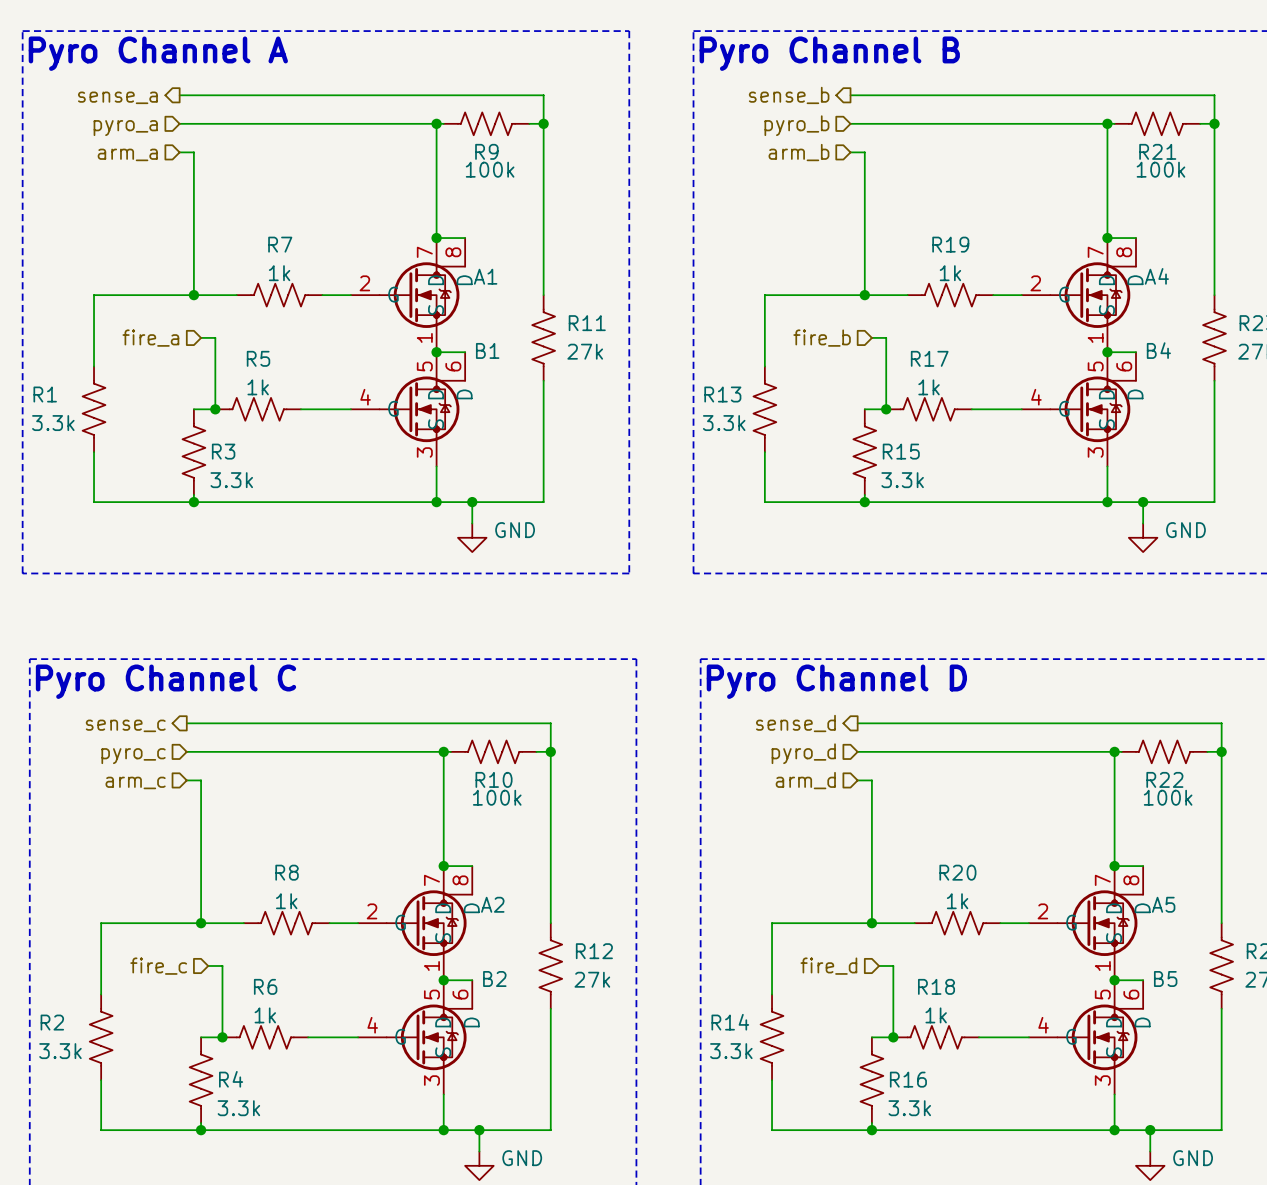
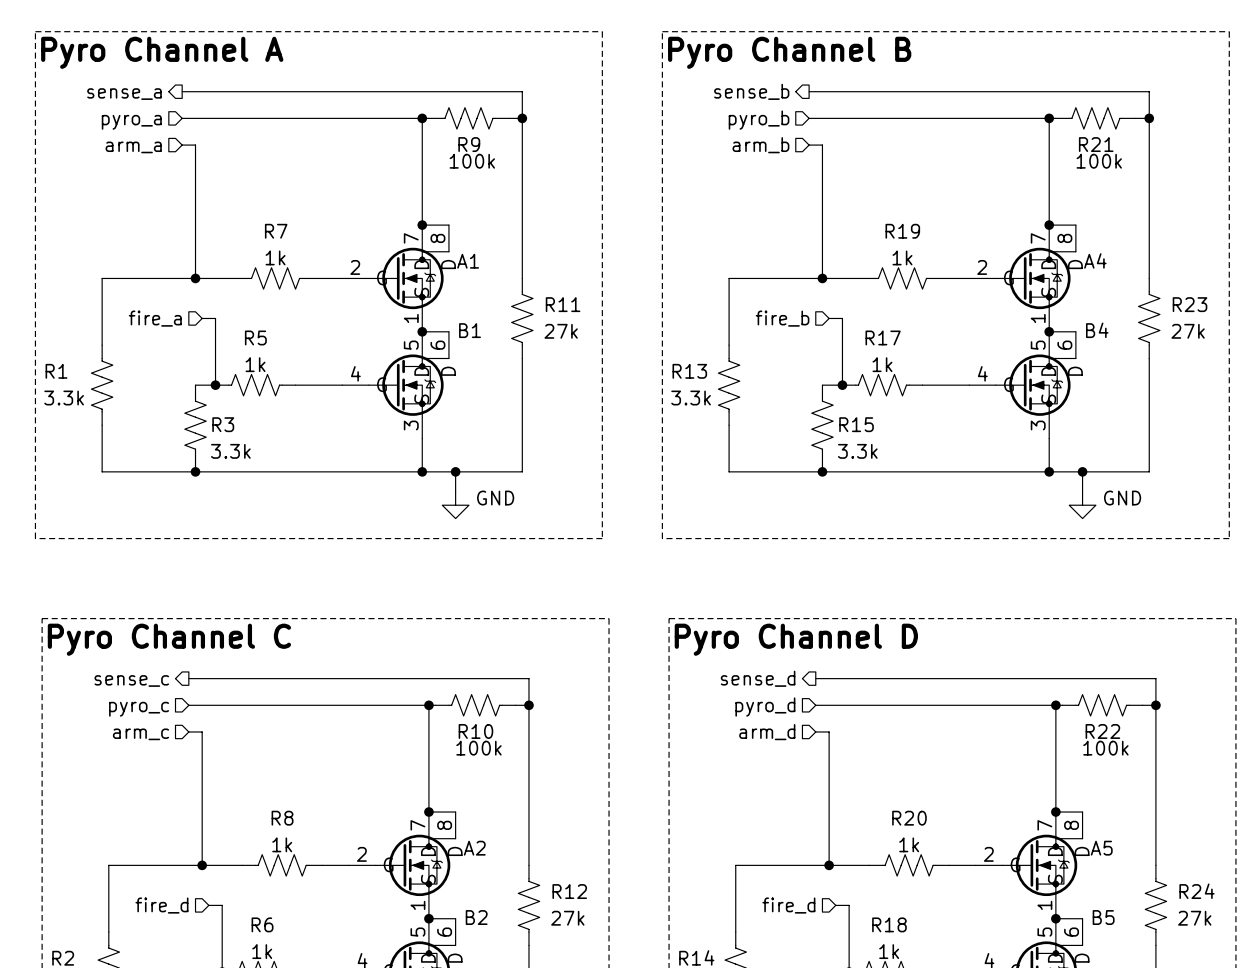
hierarchical label: fire_c (158, 966) -> fire_d (161, 905)

